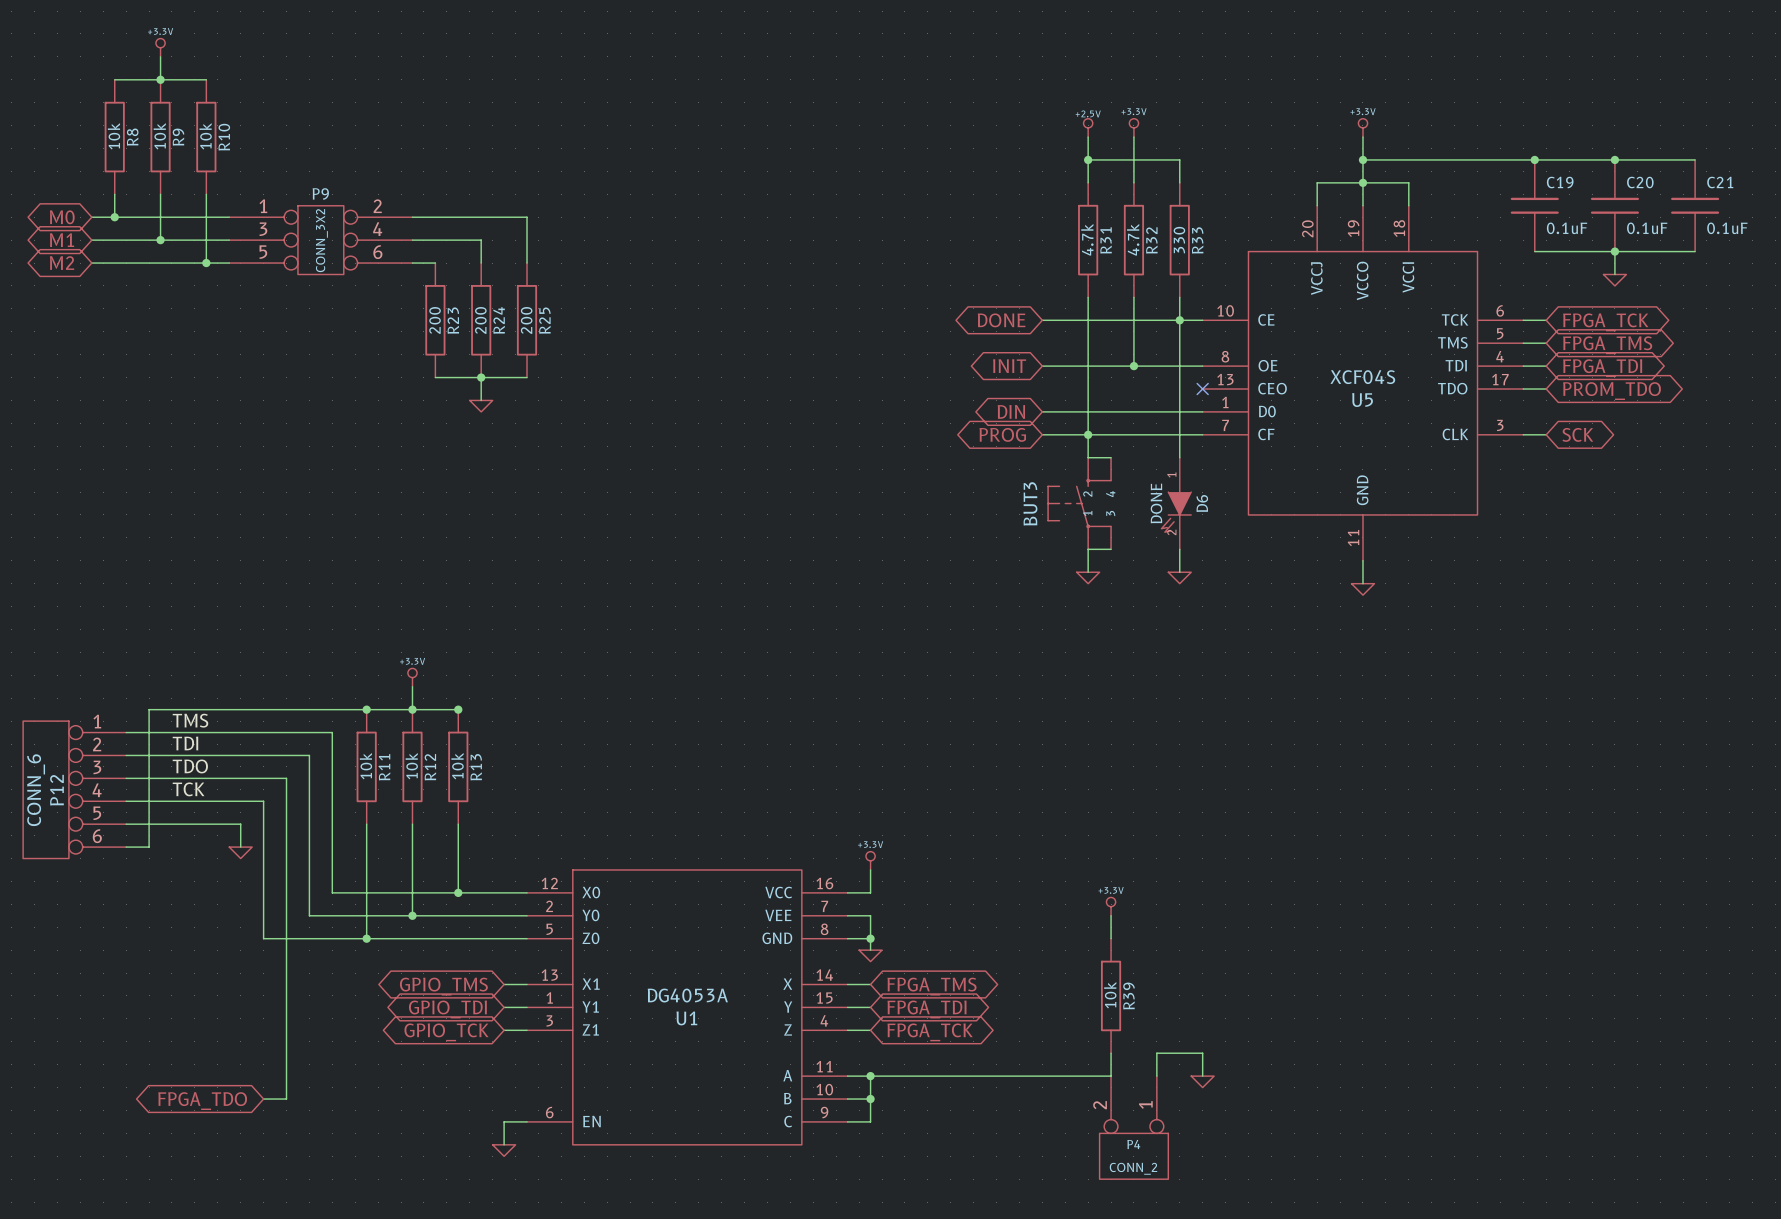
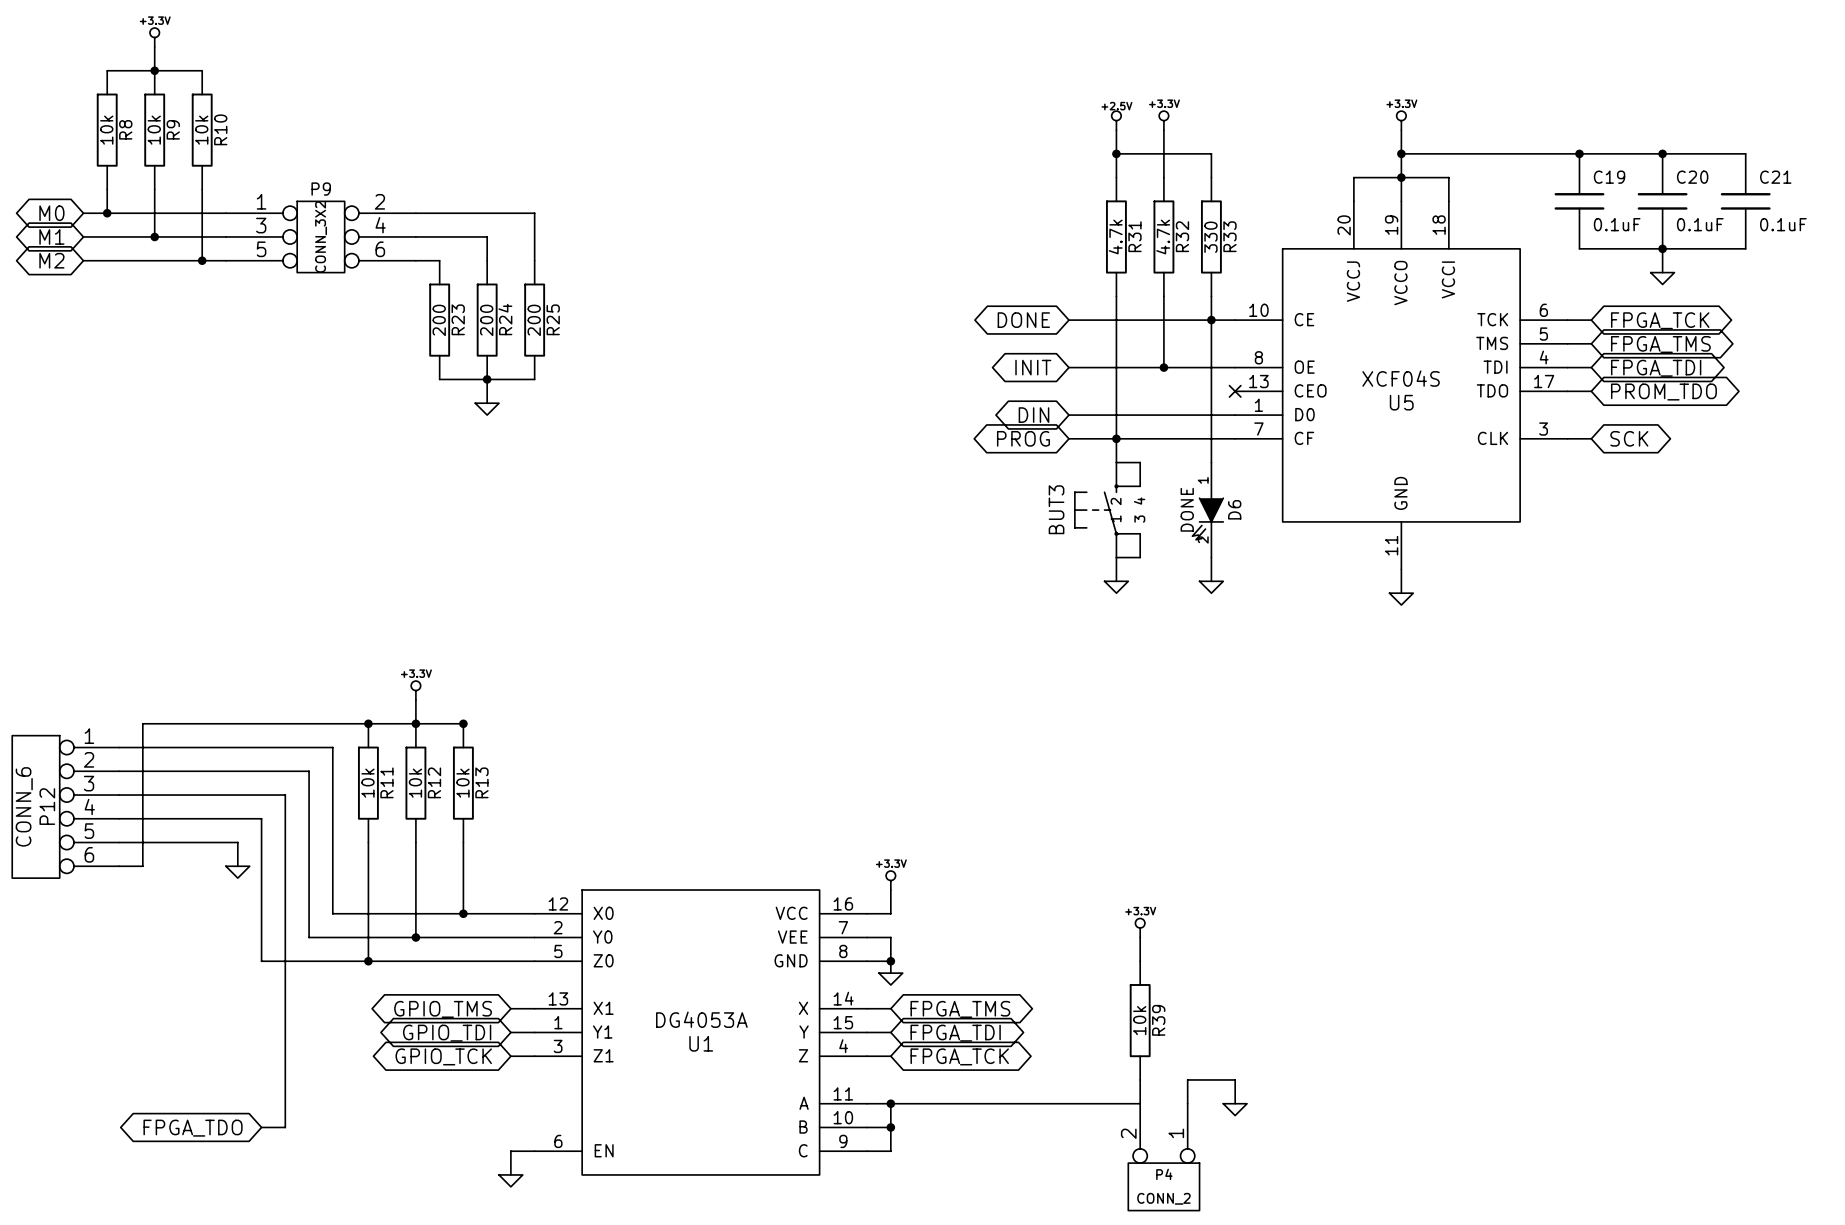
label: TMS (190, 720) -> none
label: TDI (185, 743) -> none
label: TDO (190, 766) -> none
label: TCK (188, 789) -> none

